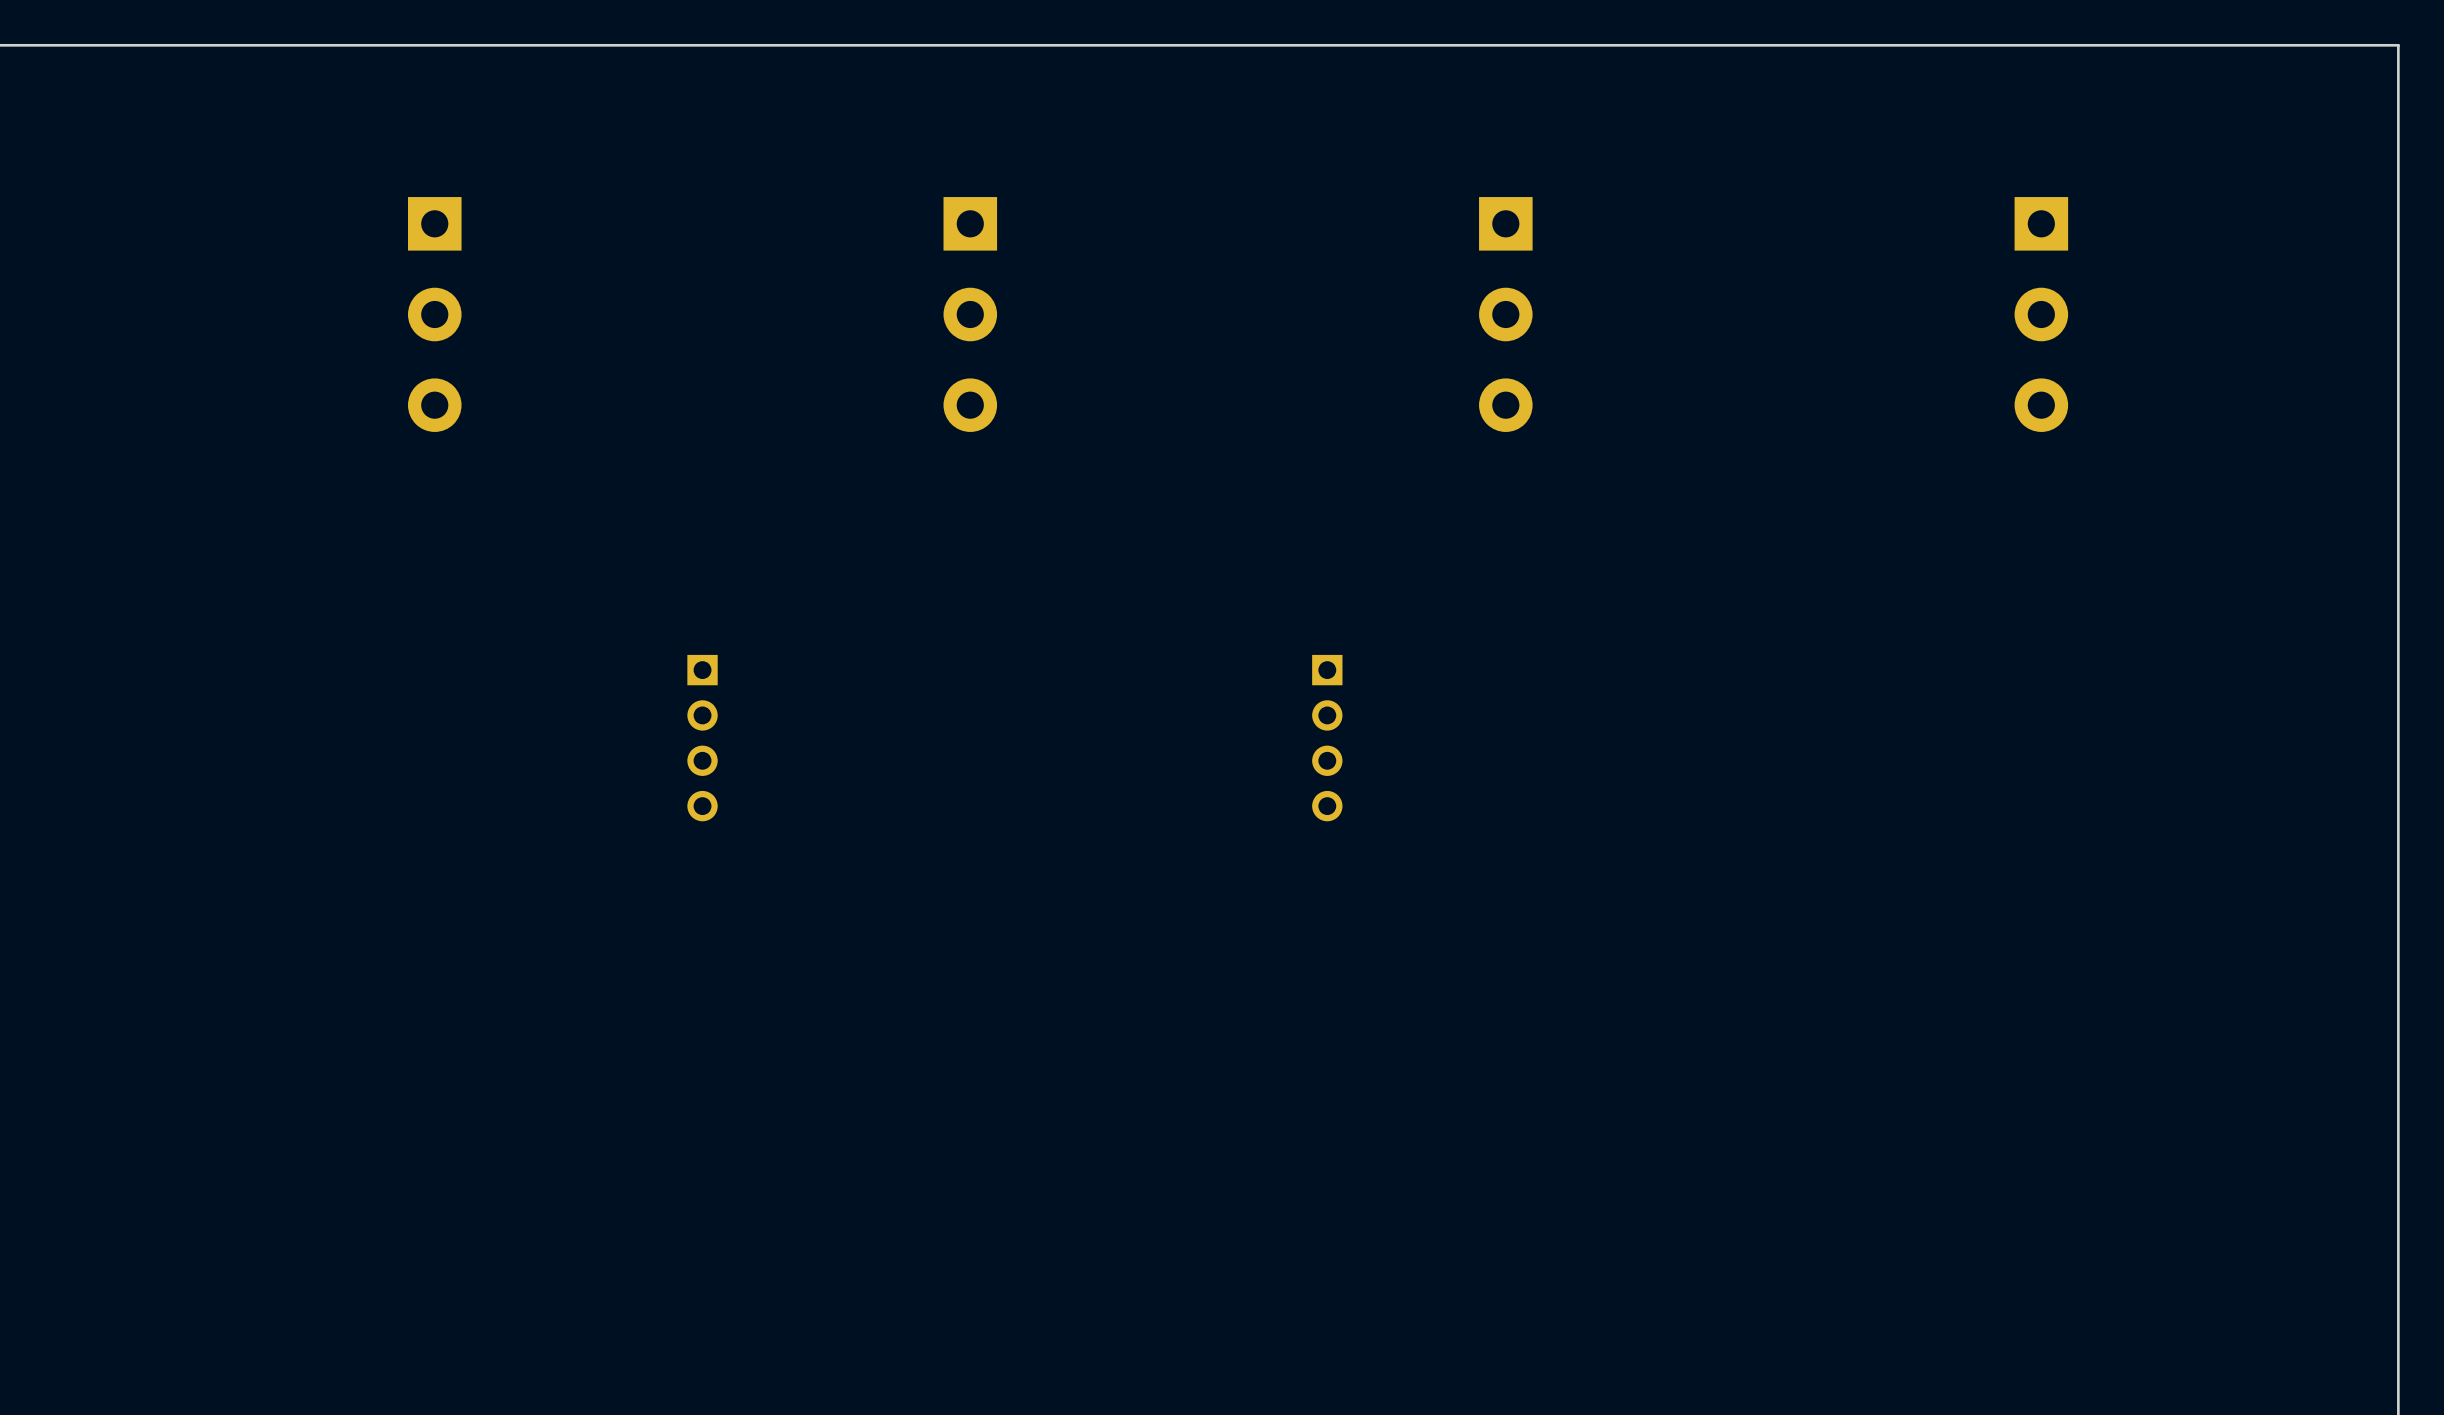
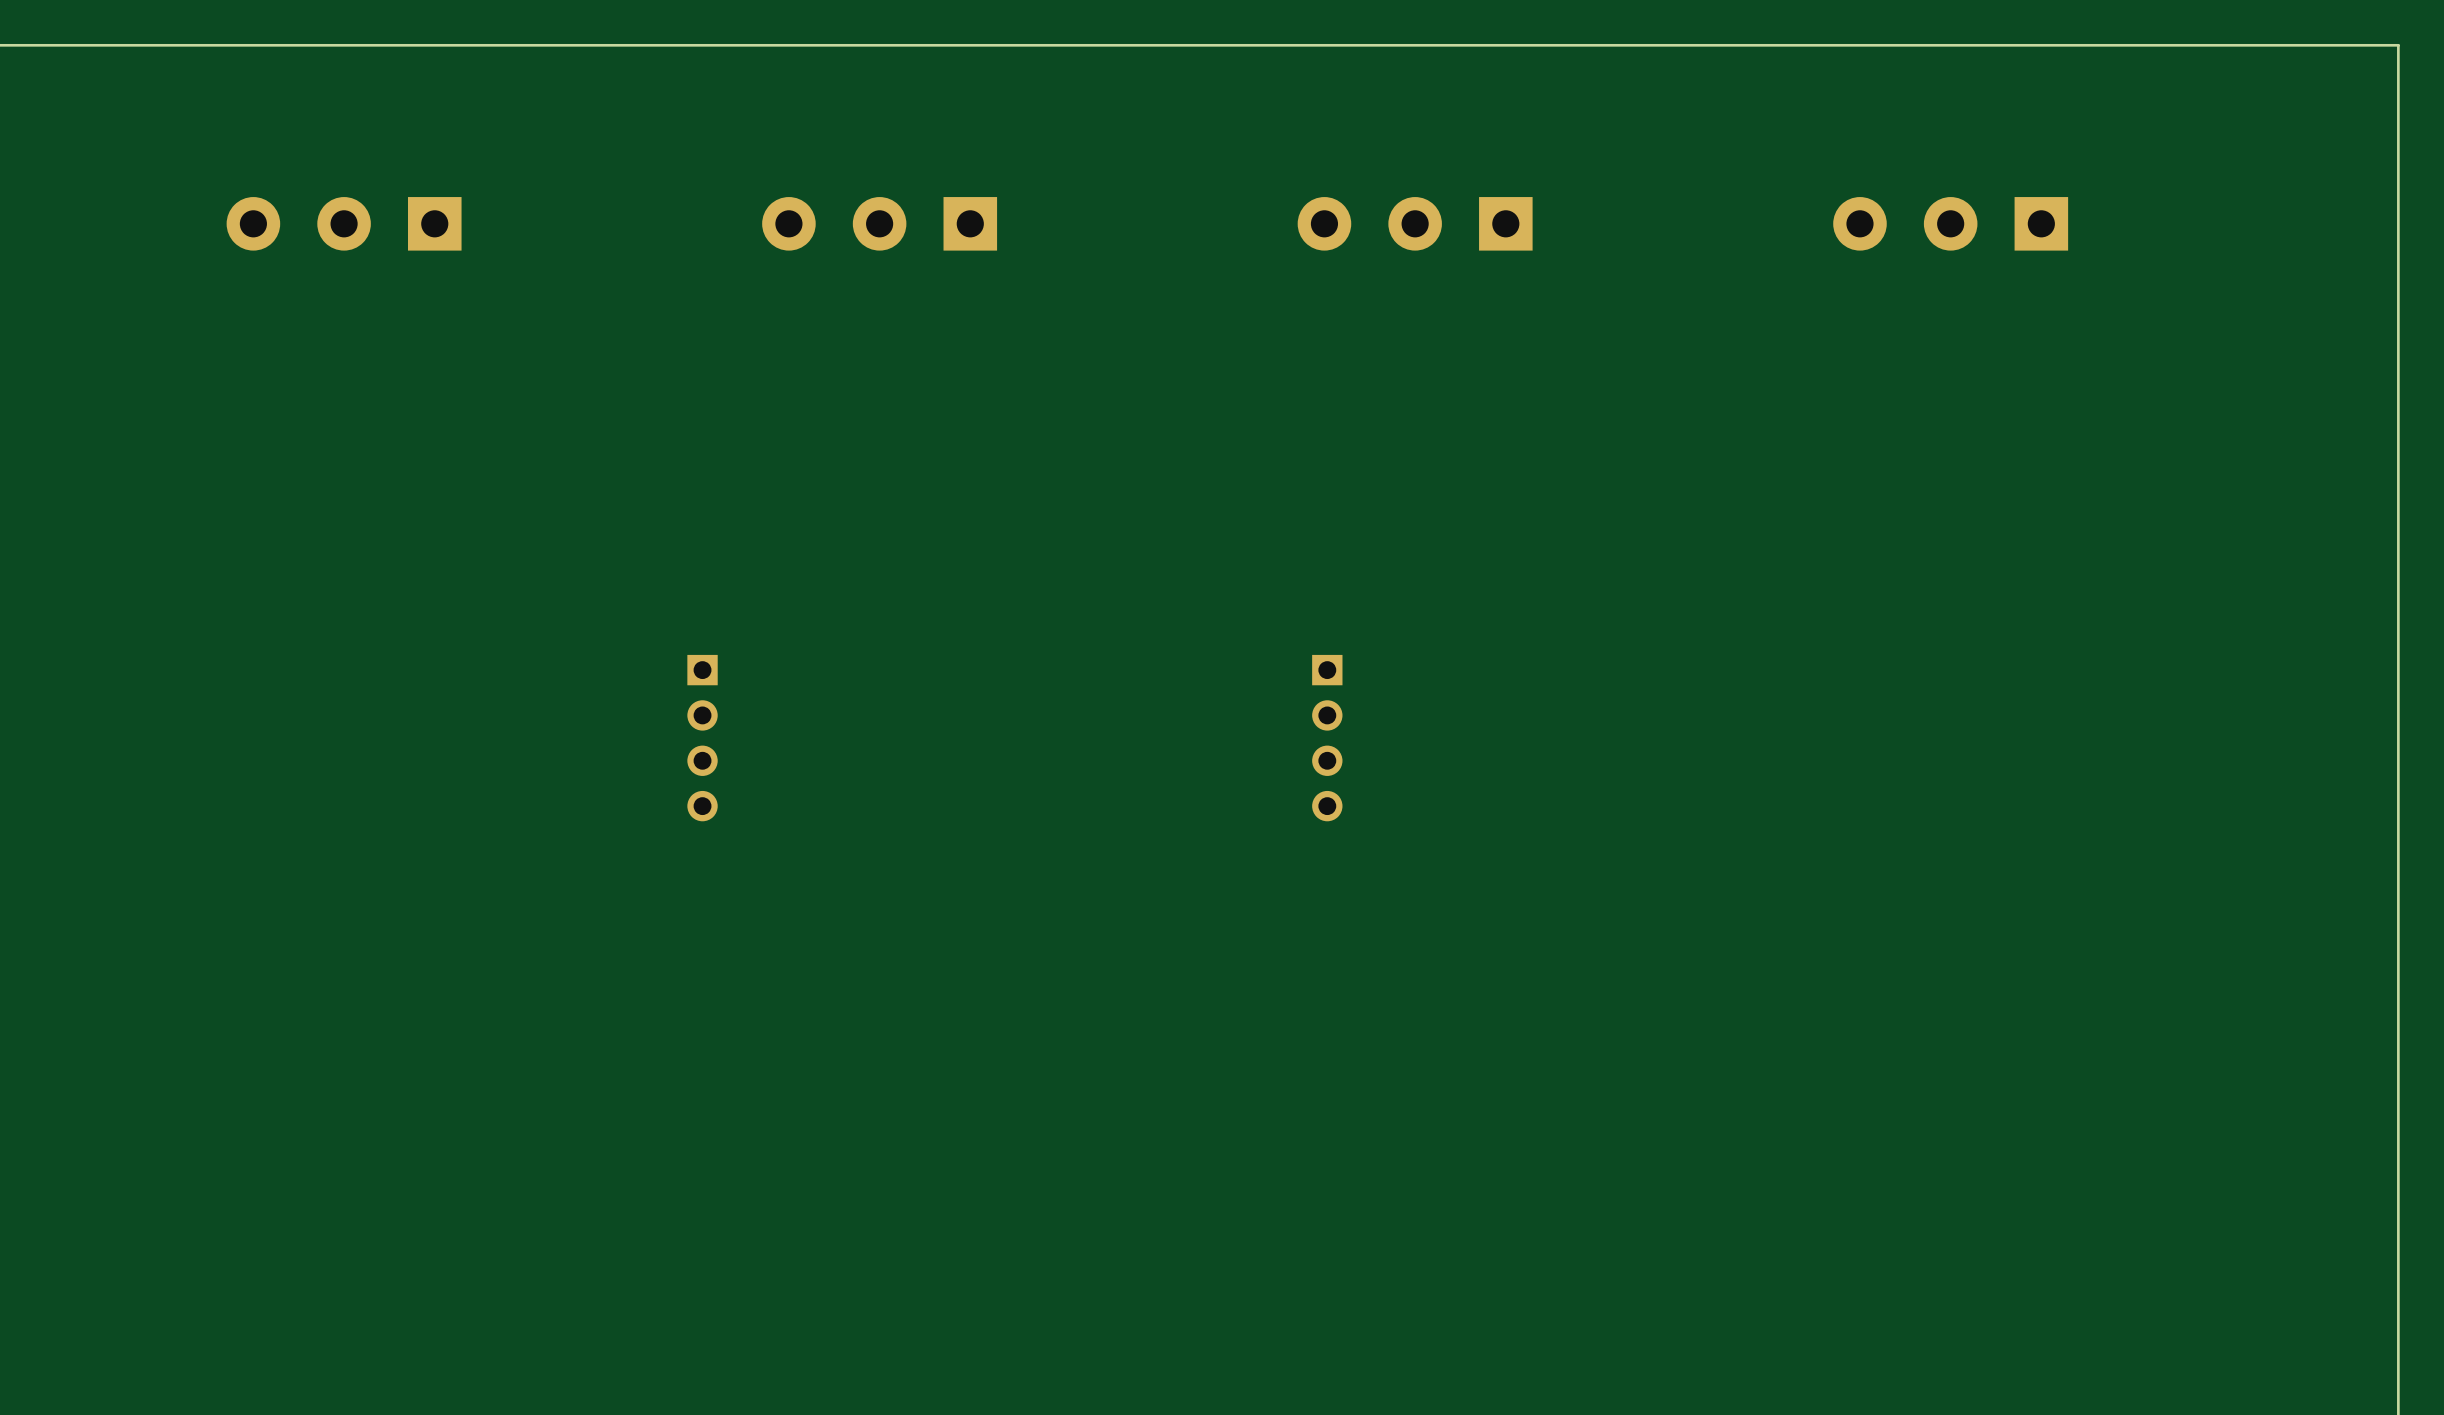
part rotation: 0° (434, 314) -> 90° clockwise (344, 223)
part rotation: 0° (970, 314) -> 90° clockwise (879, 223)
part rotation: 0° (1505, 314) -> 90° clockwise (1415, 223)
part rotation: 0° (2041, 314) -> 90° clockwise (1950, 223)

